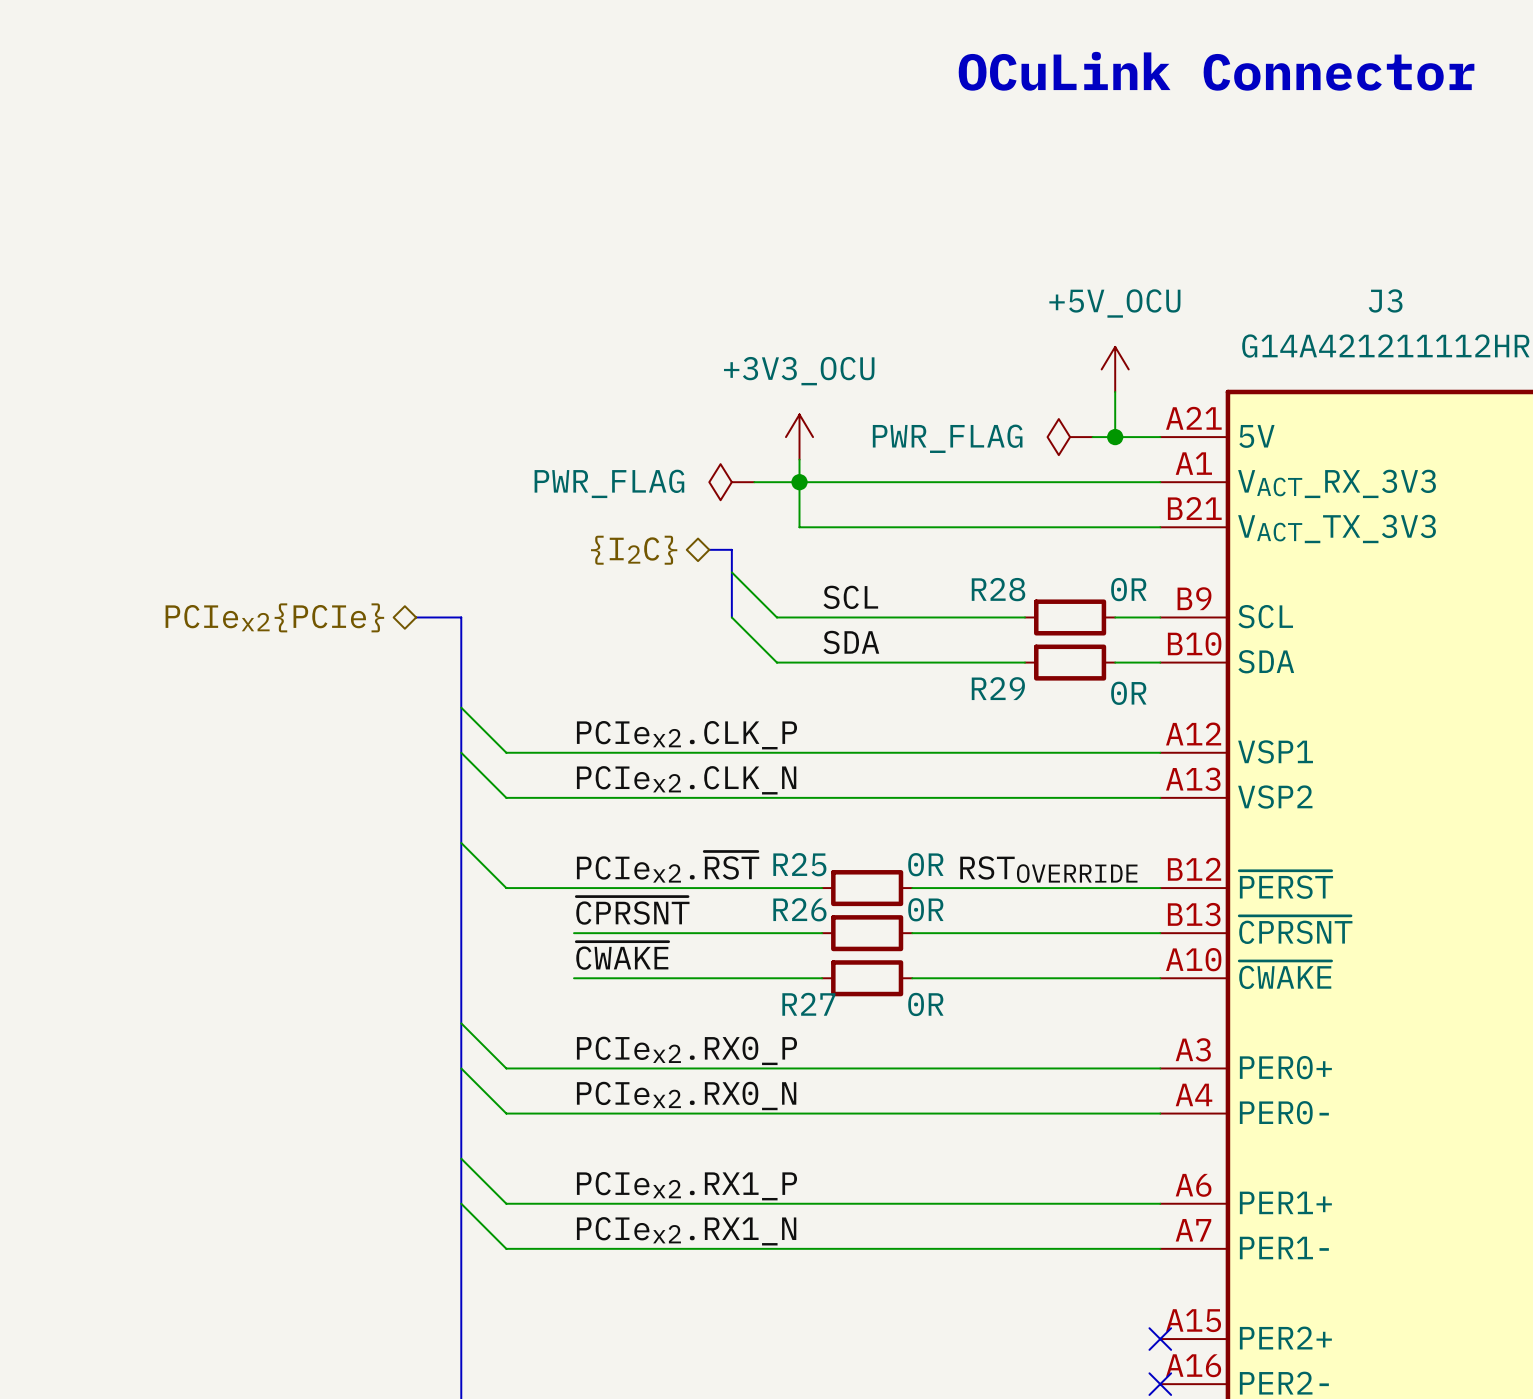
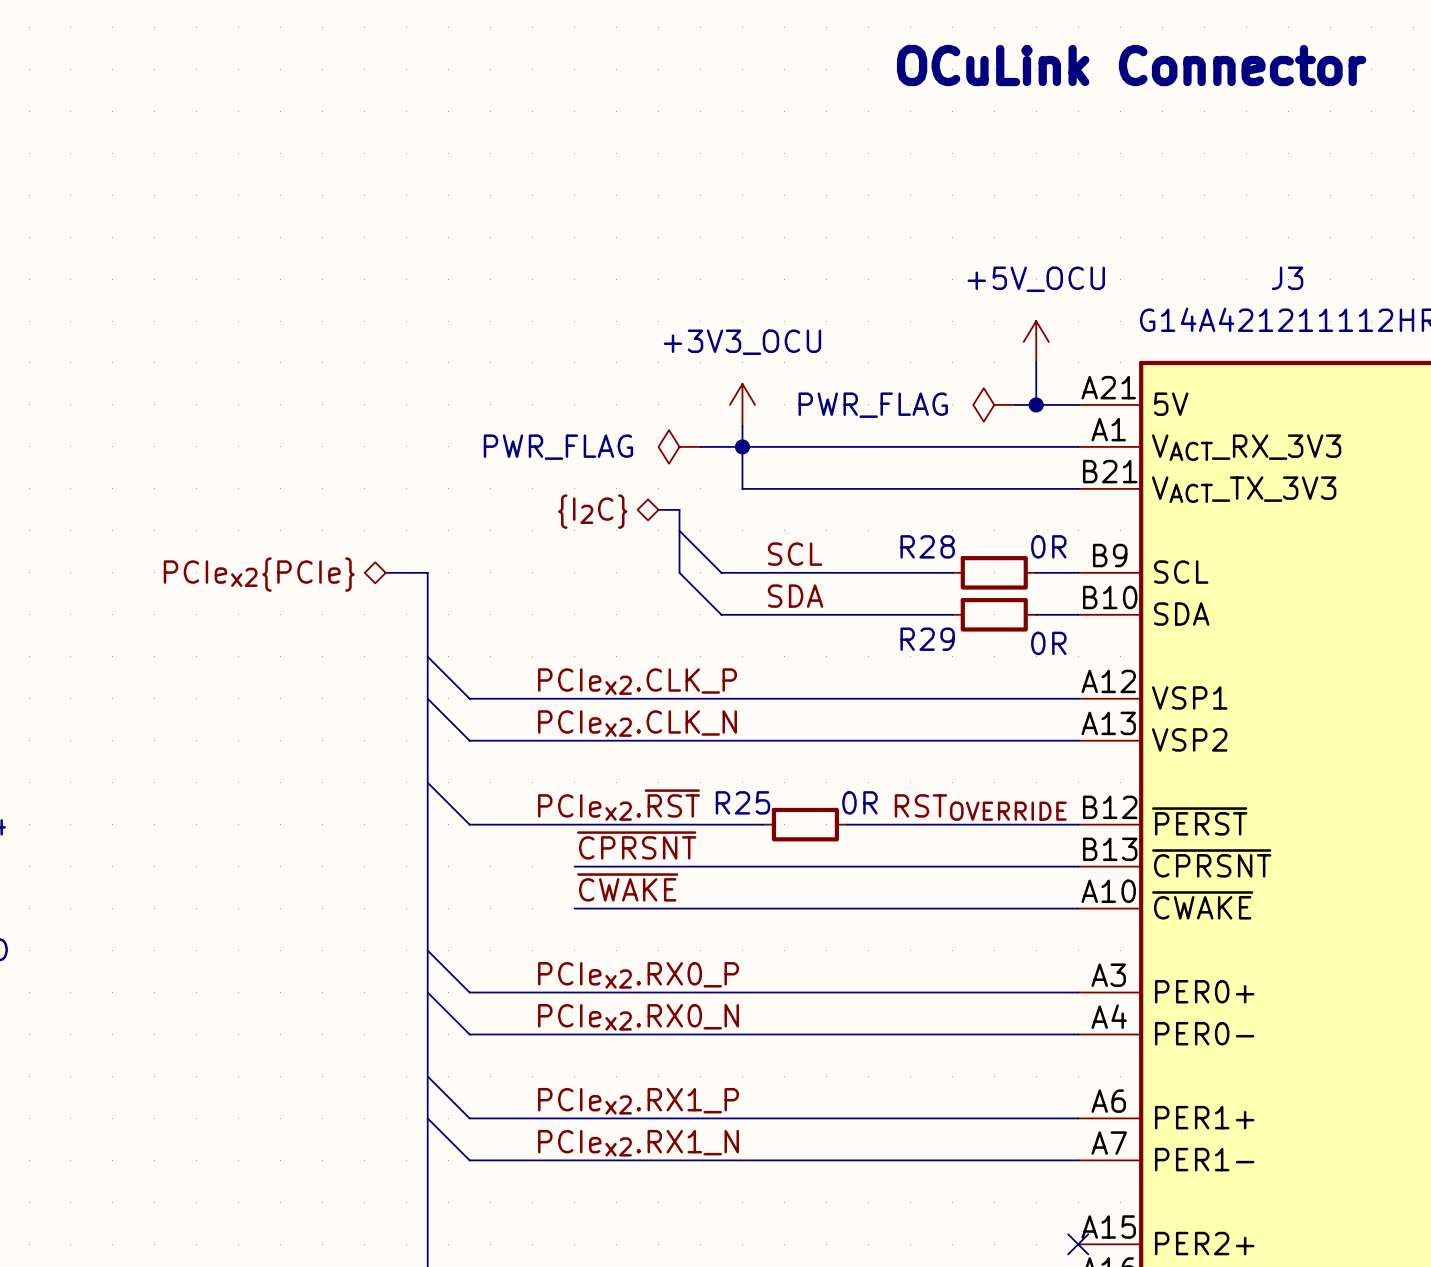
label position: ~{CPRSNT} (632, 910) -> ~{CPRSNT} (636, 845)
wire: (574, 933) (619, 933) -> none
wire: none -> (763, 866) (847, 866)
R26: (867, 933) -> none
label position: ~{CWAKE} (622, 955) -> ~{CWAKE} (627, 887)
wire: (574, 978) (619, 978) -> none
wire: none -> (763, 908) (847, 908)
R27: (867, 978) -> none

